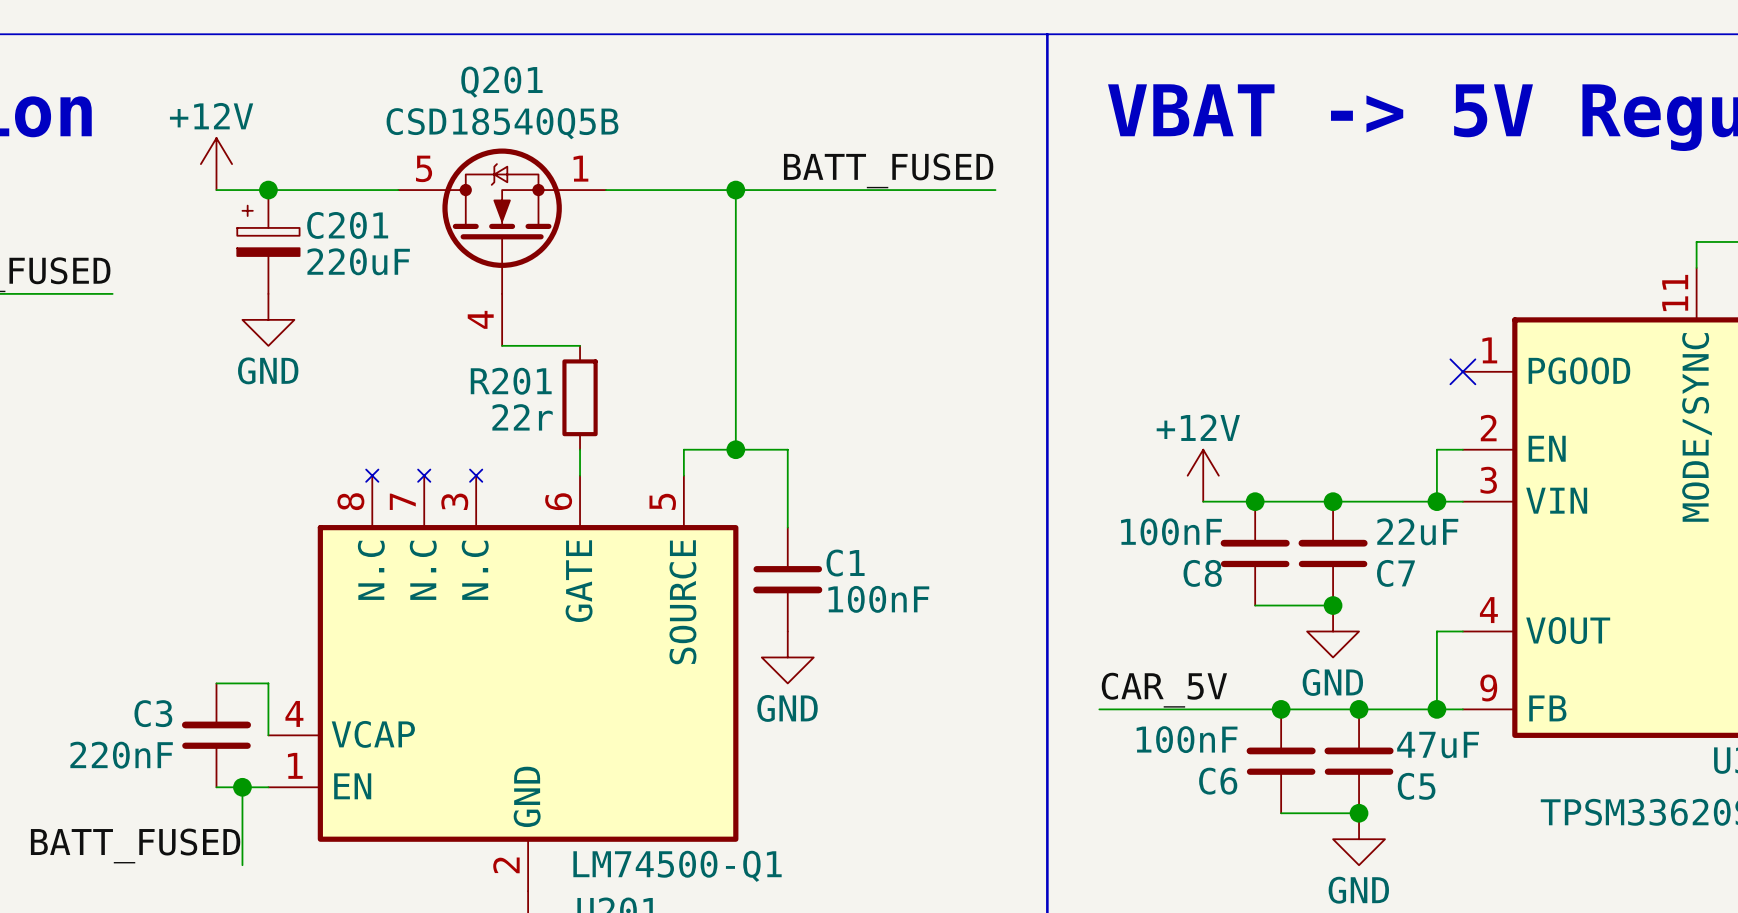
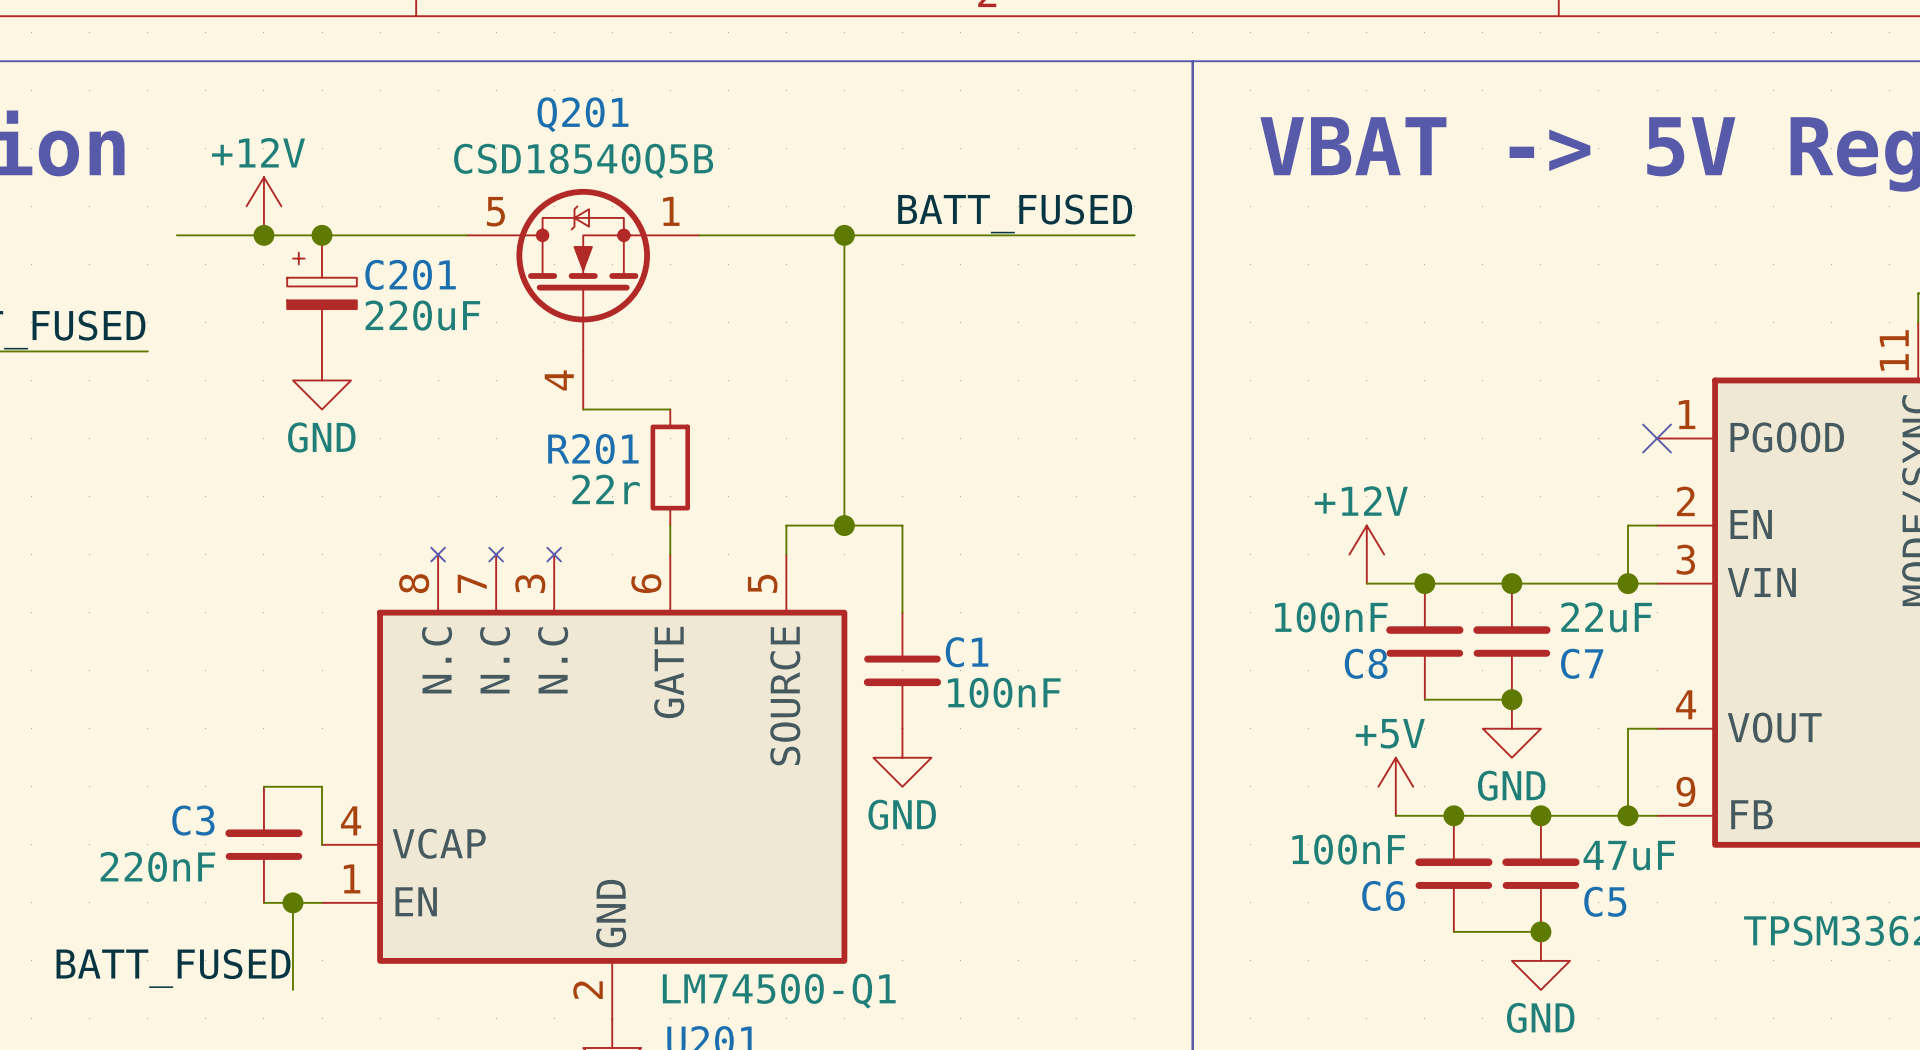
wire: none -> (176, 235) (263, 235)
junction: none -> (263, 235)
power symbol: none -> +5V (1395, 786)
label: CAR_5V (1164, 690) -> none
wire: (1099, 709) (1229, 709) -> none

